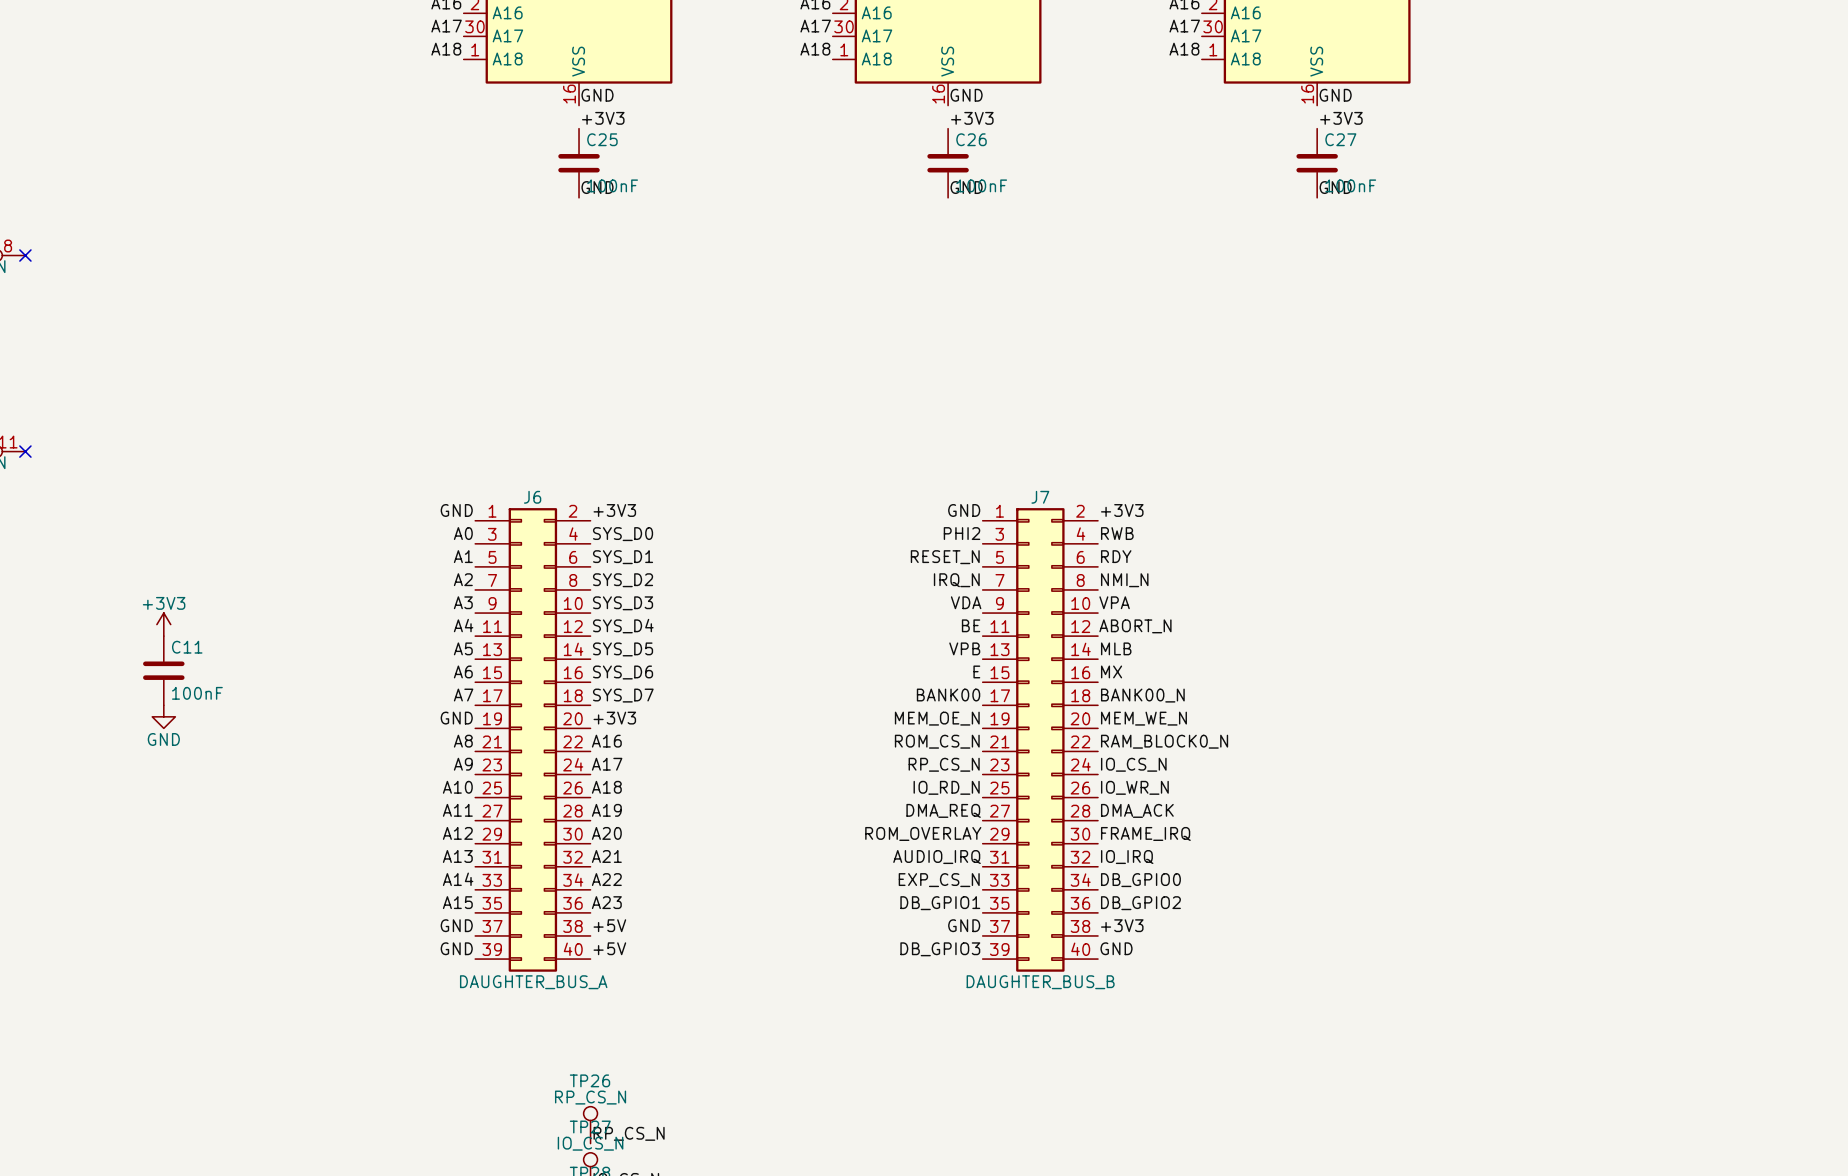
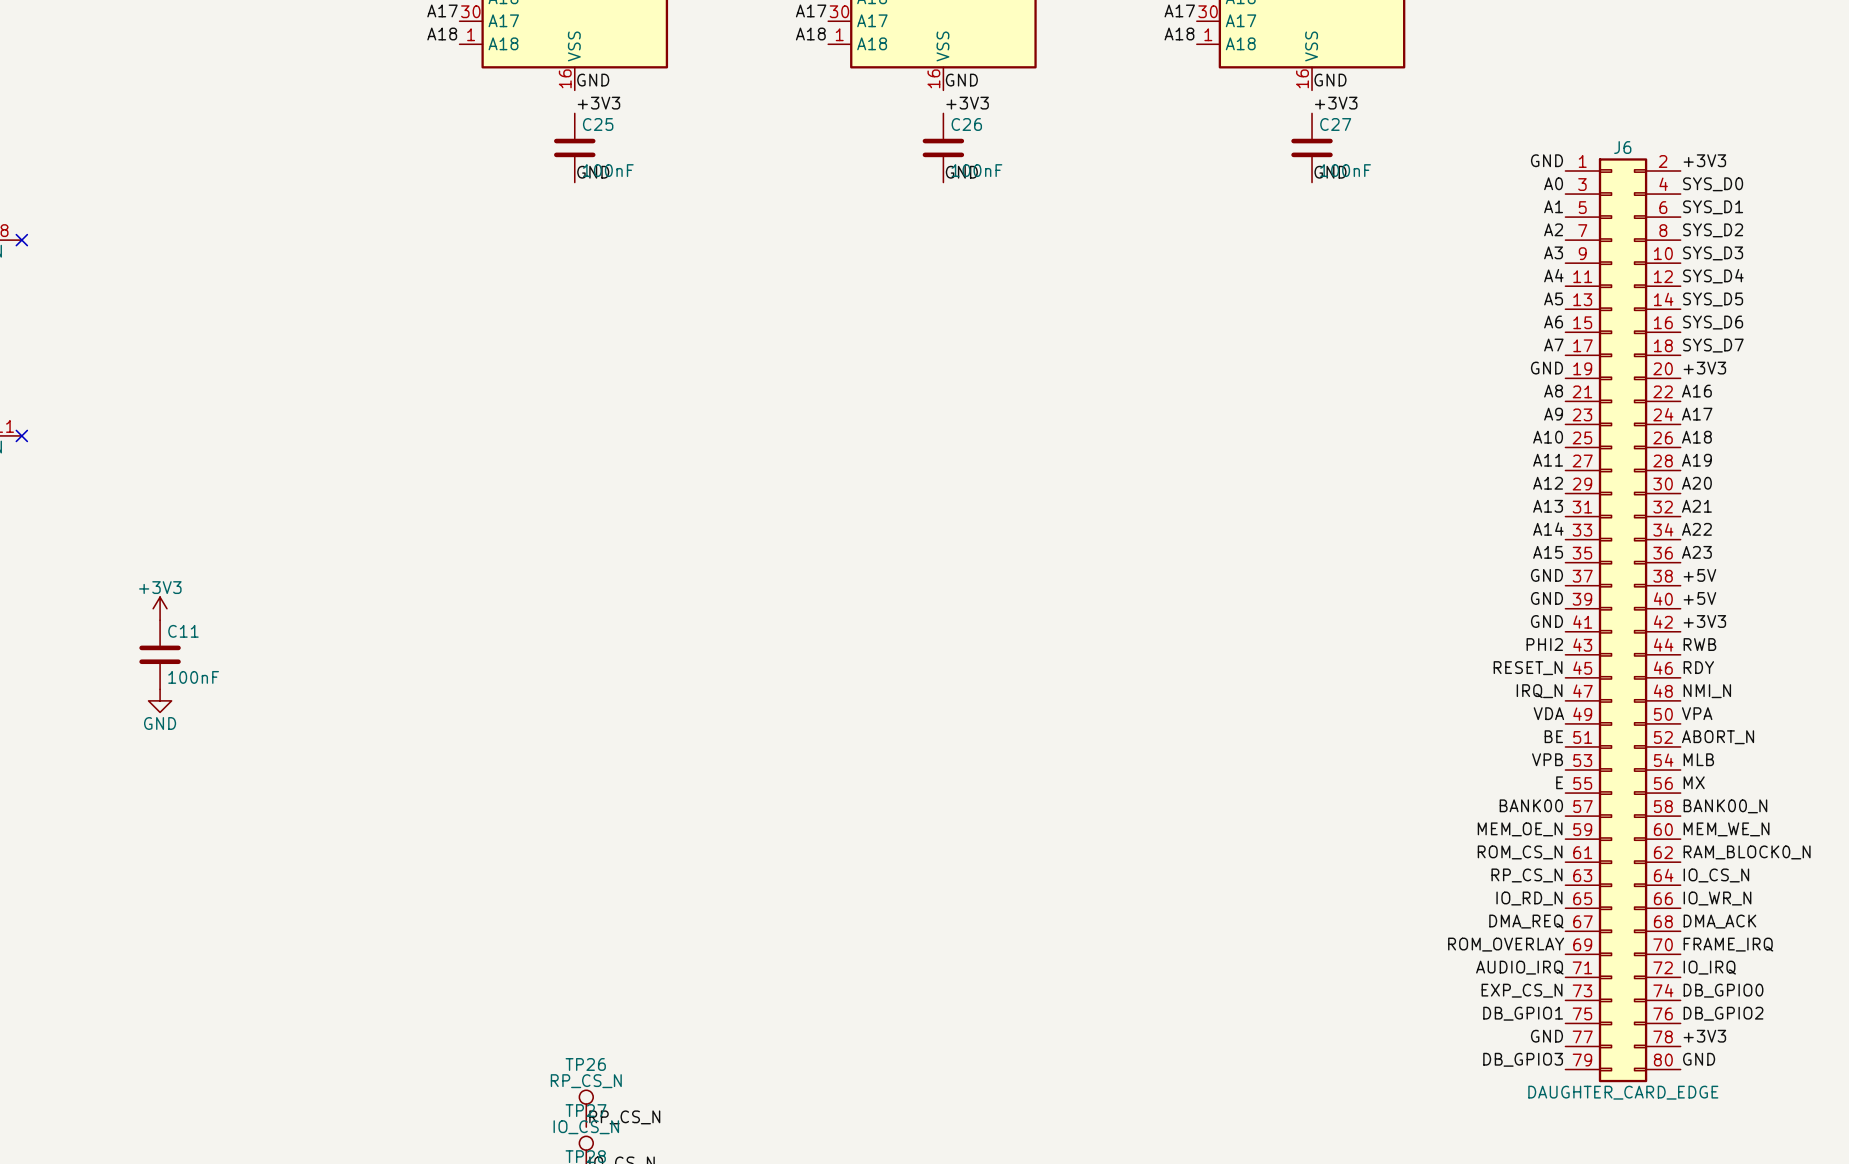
label: none -> GND (1546, 160)
label: none -> +3V3 (1704, 160)
label: none -> A0 (1553, 183)
label: none -> SYS_D0 (1713, 184)
label: none -> A1 (1553, 206)
label: none -> SYS_D1 (1713, 207)
label: none -> A2 (1553, 229)
label: none -> SYS_D2 (1713, 230)
label: none -> A3 (1553, 252)
label: none -> SYS_D3 (1713, 253)
label: none -> A4 (1553, 275)
label: none -> SYS_D4 (1713, 276)
label: none -> A5 (1553, 298)
label: none -> SYS_D5 (1713, 299)
label: none -> A6 (1553, 321)
label: none -> SYS_D6 (1713, 322)
label: none -> A7 (1553, 345)
label: none -> SYS_D7 (1713, 345)
label: none -> GND (1546, 368)
label: none -> +3V3 (1704, 368)
label: none -> A8 (1553, 391)
label: none -> A16 (1696, 391)
label: none -> A9 (1553, 414)
label: none -> A17 (1697, 414)
label: none -> A10 (1548, 437)
label: none -> A18 (1696, 437)
label: none -> A11 (1548, 460)
label: none -> A19 (1696, 460)
J6 name position: J6 (532, 497) -> J6 (1622, 147)
label: none -> A12 (1548, 483)
label: none -> A20 (1696, 483)
J6 symbol: [475, 508, 591, 972] -> [1565, 158, 1681, 1083]
label: GND (456, 510) -> none
label: +3V3 (614, 510) -> none
label: GND (964, 510) -> none
label: +3V3 (1122, 510) -> none
label: none -> A13 (1548, 506)
label: none -> A21 (1696, 506)
label: A0 (463, 533) -> none
label: PHI2 (962, 533) -> none
label: RWB (1117, 533) -> none
label: SYS_D0 (623, 534) -> none
label: none -> A14 (1548, 529)
label: none -> A22 (1696, 529)
label: A1 (463, 556) -> none
label: RDY (1116, 556) -> none
label: SYS_D1 (623, 557) -> none
label: RESET_N (945, 557) -> none
label: none -> A15 (1548, 552)
label: none -> A23 (1696, 552)
label: A2 (463, 579) -> none
label: SYS_D2 (623, 580) -> none
label: IRQ_N (956, 580) -> none
label: NMI_N (1124, 580) -> none
label: none -> GND (1546, 575)
label: none -> +5V (1699, 575)
label: A3 (463, 602) -> none
label: VDA (966, 602) -> none
label: VPA (1114, 602) -> none
label: SYS_D3 (623, 603) -> none
label: none -> GND (1546, 598)
label: none -> +5V (1699, 598)
label: A4 (463, 625) -> none
label: BE (971, 625) -> none
label: SYS_D4 (623, 626) -> none
label: ABORT_N (1135, 626) -> none
label: none -> GND (1546, 621)
label: none -> +3V3 (1704, 621)
label: A5 (463, 648) -> none
label: VPB (964, 648) -> none
label: MLB (1116, 648) -> none
label: SYS_D5 (623, 649) -> none
label: none -> PHI2 (1544, 644)
label: none -> RWB (1699, 644)
label: A6 (463, 671) -> none
label: E (976, 671) -> none
label: MX (1111, 671) -> none
label: SYS_D6 (623, 672) -> none
label: none -> RDY (1698, 667)
label: none -> RESET_N (1528, 668)
label: A7 (463, 695) -> none
label: SYS_D7 (623, 695) -> none
label: BANK00 (948, 695) -> none
label: BANK00_N (1142, 695) -> none
label: none -> IRQ_N (1539, 691)
label: none -> NMI_N (1707, 691)
label: GND (456, 718) -> none
label: +3V3 (614, 718) -> none
label: MEM_OE_N (937, 718) -> none
label: MEM_WE_N (1143, 718) -> none
label: none -> VDA (1548, 713)
label: none -> VPA (1697, 713)
J7: DAUGHTER_BUS_B (1040, 739) -> none
label: A8 (463, 741) -> none
label: A16 (606, 741) -> none
label: ROM_CS_N (937, 741) -> none
label: RAM_BLOCK0_N (1164, 741) -> none
label: none -> BE (1553, 736)
label: none -> ABORT_N (1718, 737)
label: A9 (463, 764) -> none
label: A17 (607, 764) -> none
label: RP_CS_N (944, 764) -> none
label: IO_CS_N (1133, 764) -> none
label: none -> VPB (1547, 759)
label: none -> MLB (1698, 759)
label: A10 (457, 787) -> none
label: A18 (606, 787) -> none
label: IO_RD_N (946, 787) -> none
label: IO_WR_N (1134, 787) -> none
label: none -> E (1559, 782)
label: none -> MX (1694, 782)
label: A11 (457, 810) -> none
label: A19 (606, 810) -> none
label: DMA_REQ (943, 810) -> none
label: DMA_ACK (1137, 810) -> none
label: none -> BANK00 (1531, 805)
label: none -> BANK00_N (1725, 806)
label: A12 (457, 833) -> none
label: A20 (606, 833) -> none
label: ROM_OVERLAY (923, 833) -> none
label: FRAME_IRQ (1145, 833) -> none
label: none -> MEM_OE_N (1520, 829)
label: none -> MEM_WE_N (1726, 829)
label: A13 (457, 856) -> none
label: A21 (606, 856) -> none
label: AUDIO_IRQ (937, 857) -> none
label: IO_IRQ (1127, 857) -> none
label: none -> ROM_CS_N (1520, 852)
label: none -> RAM_BLOCK0_N (1747, 852)
label: A14 (458, 879) -> none
label: A22 (606, 879) -> none
label: EXP_CS_N (939, 880) -> none
label: DB_GPIO0 (1140, 880) -> none
label: none -> RP_CS_N (1526, 875)
label: none -> IO_CS_N (1716, 875)
label: A15 (457, 902) -> none
label: A23 (606, 902) -> none
label: DB_GPIO1 (940, 903) -> none
label: DB_GPIO2 (1140, 903) -> none
label: none -> IO_RD_N (1529, 898)
label: none -> IO_WR_N (1717, 898)
label: GND (456, 925) -> none
label: +5V (609, 925) -> none
label: GND (964, 925) -> none
label: +3V3 (1122, 925) -> none
label: none -> DMA_REQ (1526, 921)
label: none -> DMA_ACK (1719, 921)
label: GND (456, 948) -> none
label: +5V (609, 948) -> none
label: GND (1116, 948) -> none
label: DB_GPIO3 (940, 949) -> none
label: none -> ROM_OVERLAY (1506, 944)
label: none -> FRAME_IRQ (1728, 944)
J6 value: DAUGHTER_BUS_A (533, 982) -> DAUGHTER_CARD_EDGE (1623, 1092)
label: none -> AUDIO_IRQ (1519, 967)
label: none -> IO_IRQ (1709, 967)
label: none -> EXP_CS_N (1522, 990)
label: none -> DB_GPIO0 (1723, 990)
label: none -> DB_GPIO1 (1523, 1013)
label: none -> DB_GPIO2 (1723, 1013)
label: none -> GND (1546, 1036)
label: none -> +3V3 (1704, 1036)
label: none -> GND (1699, 1059)
label: none -> DB_GPIO3 (1523, 1059)

